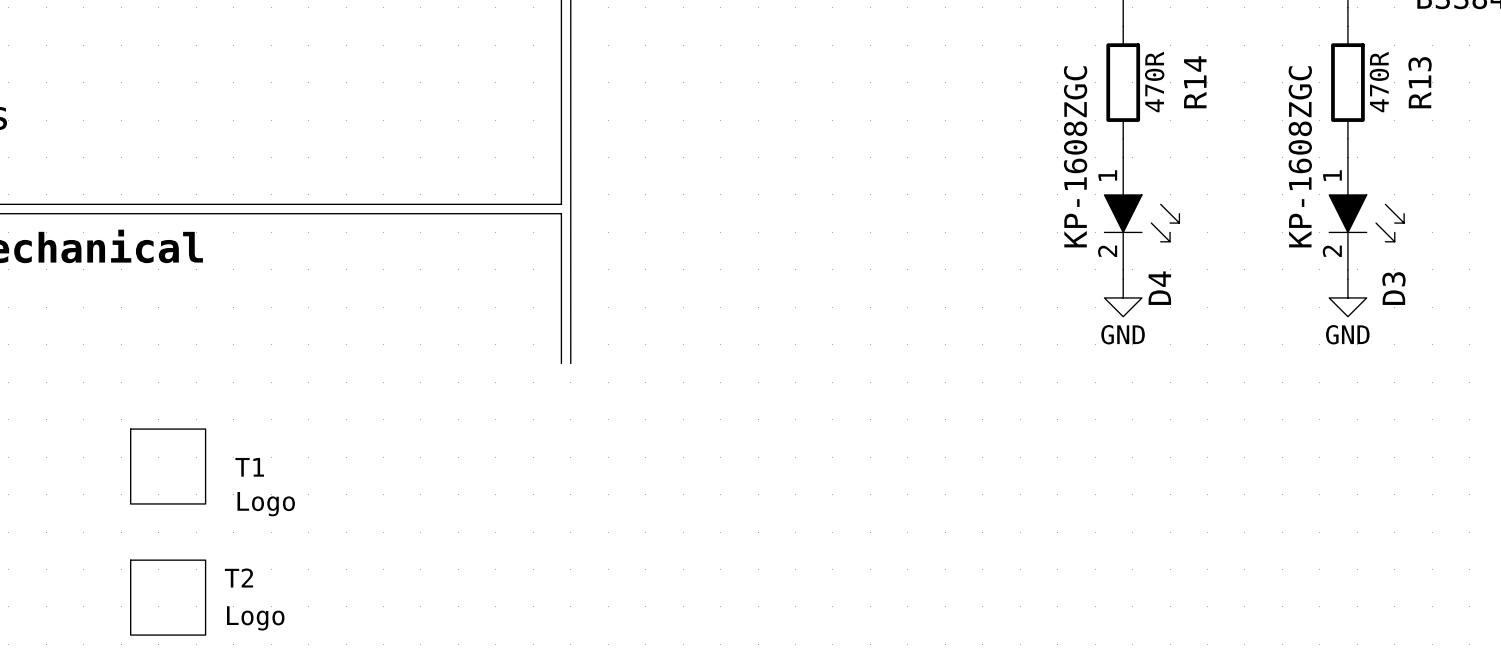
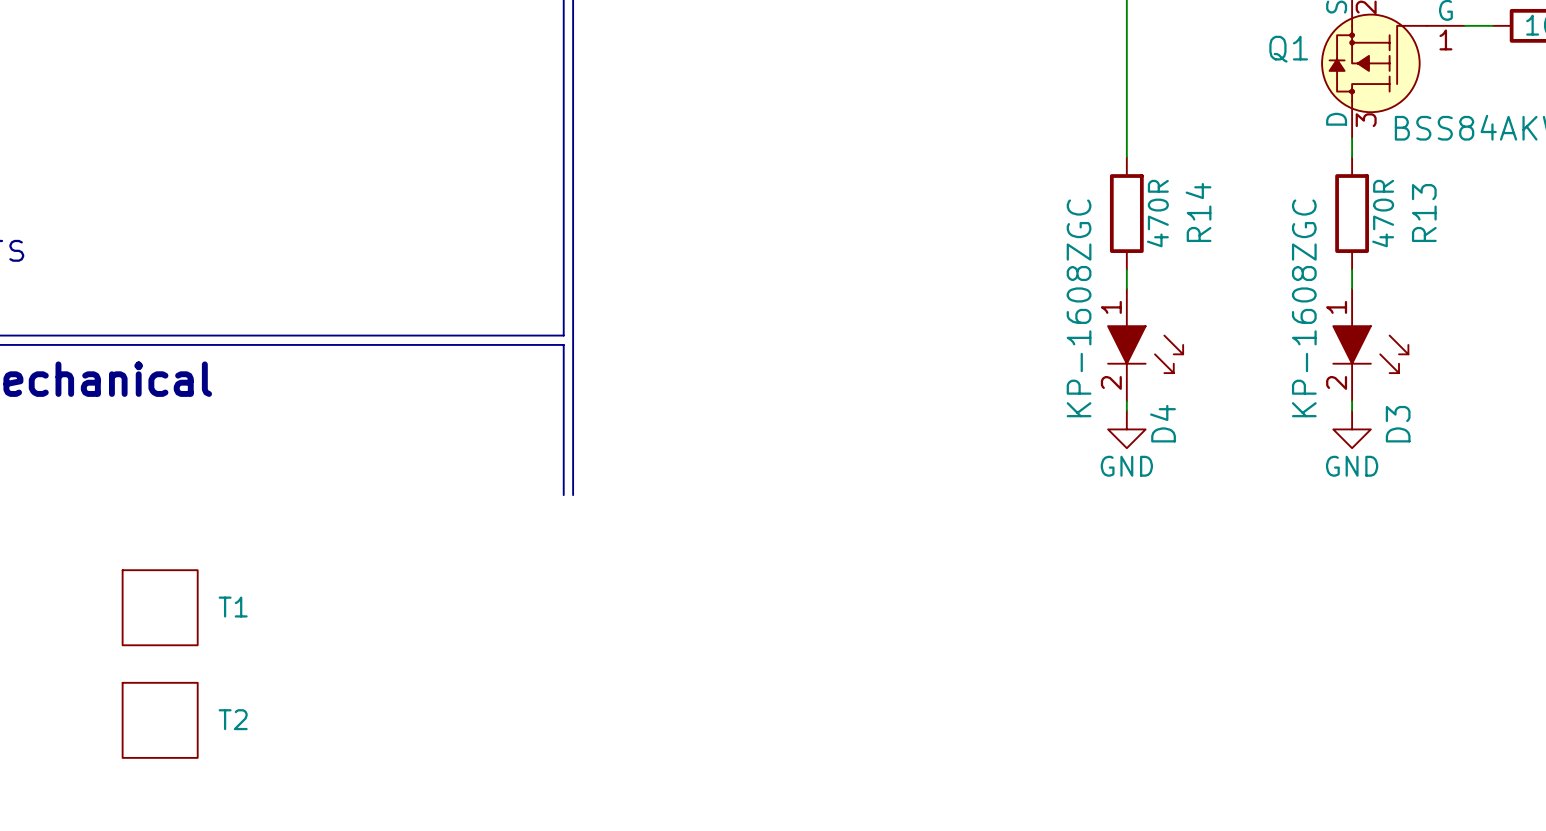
T1 position: (168, 466) -> (160, 607)
T1 name position: T1 (249, 467) -> T1 (233, 607)
T1 value: Logo (266, 504) -> none
T2 name position: T2 (238, 578) -> T2 (233, 719)
T2 position: (168, 597) -> (160, 720)
T2 value: Logo (255, 618) -> none

